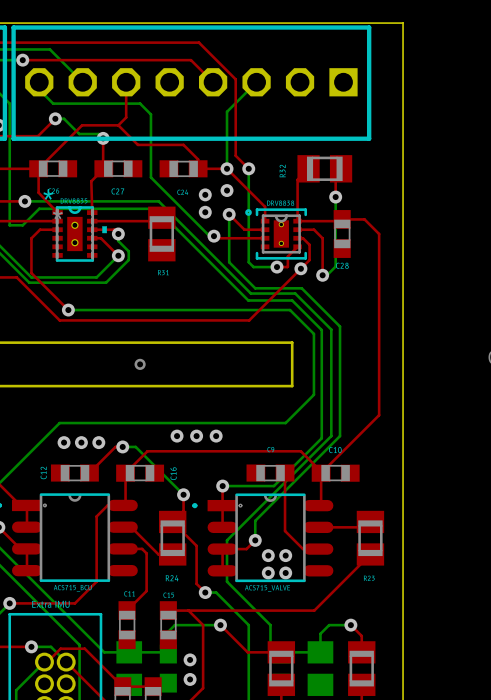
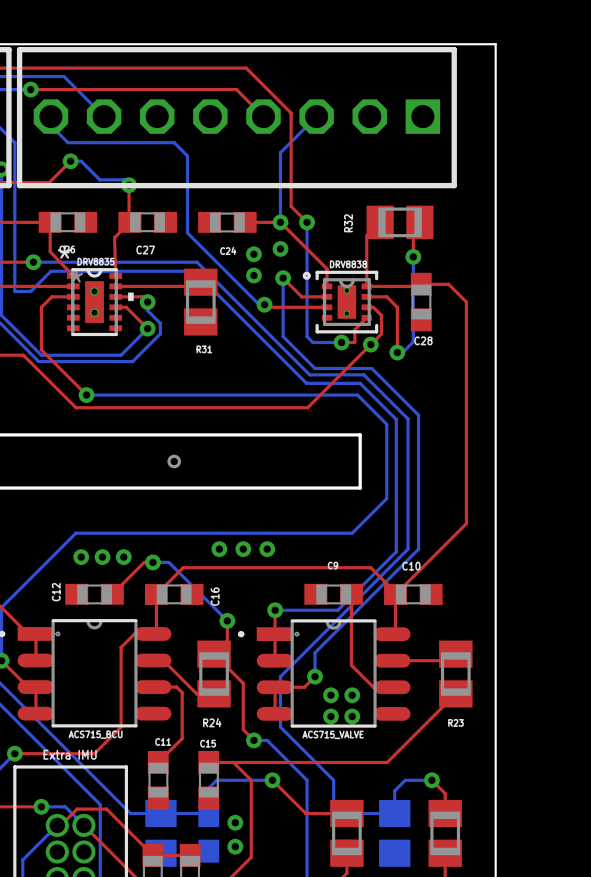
top track: (126, 82) (126, 117) (118, 125) -> none
top track: (118, 125) (82, 125) (38, 168) -> none
top track: (118, 125) (137, 144) (183, 144) (198, 159) (198, 168) -> none

